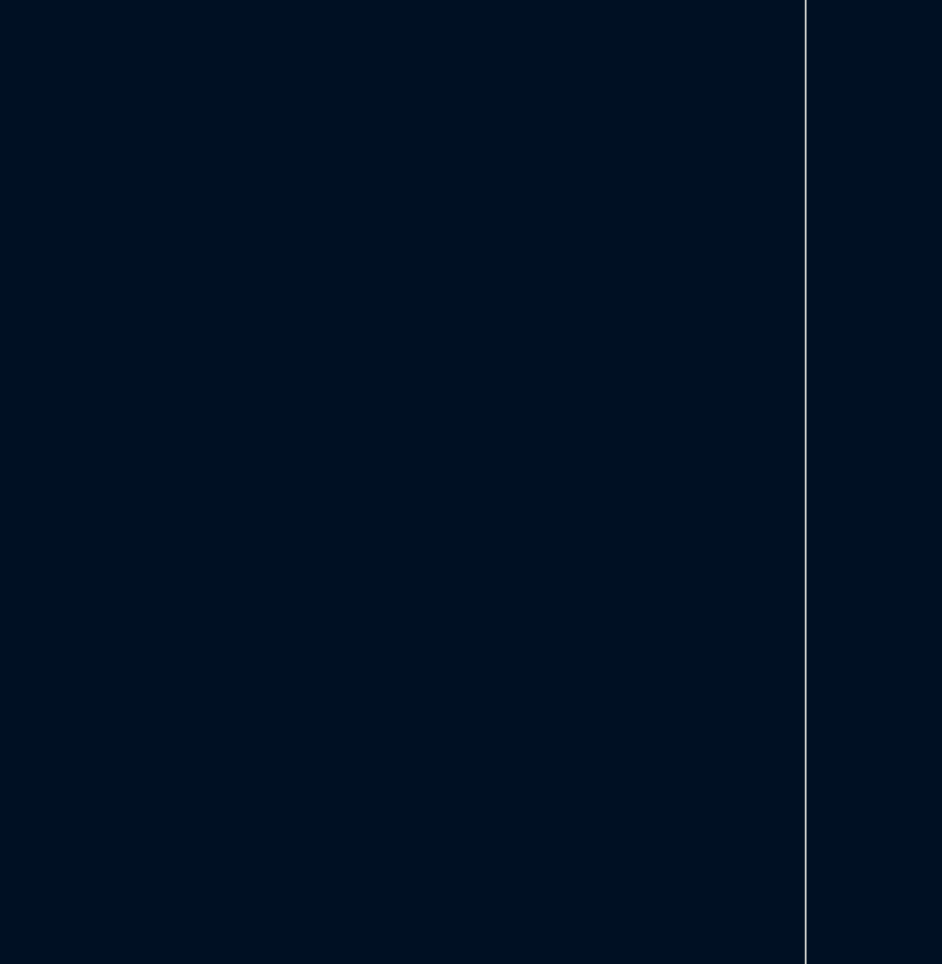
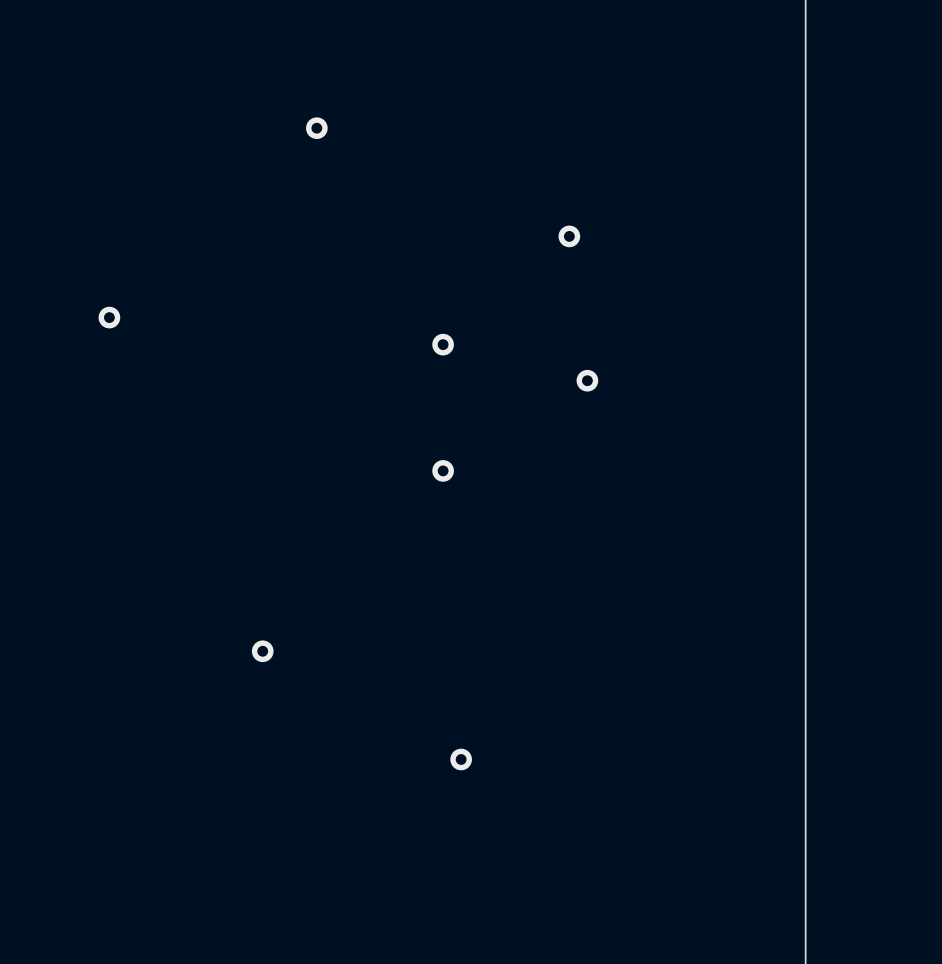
via: none -> (316, 128)
via: none -> (569, 236)
via: none -> (109, 317)
via: none -> (443, 344)
via: none -> (587, 380)
via: none -> (443, 470)
via: none -> (262, 651)
via: none -> (461, 759)

